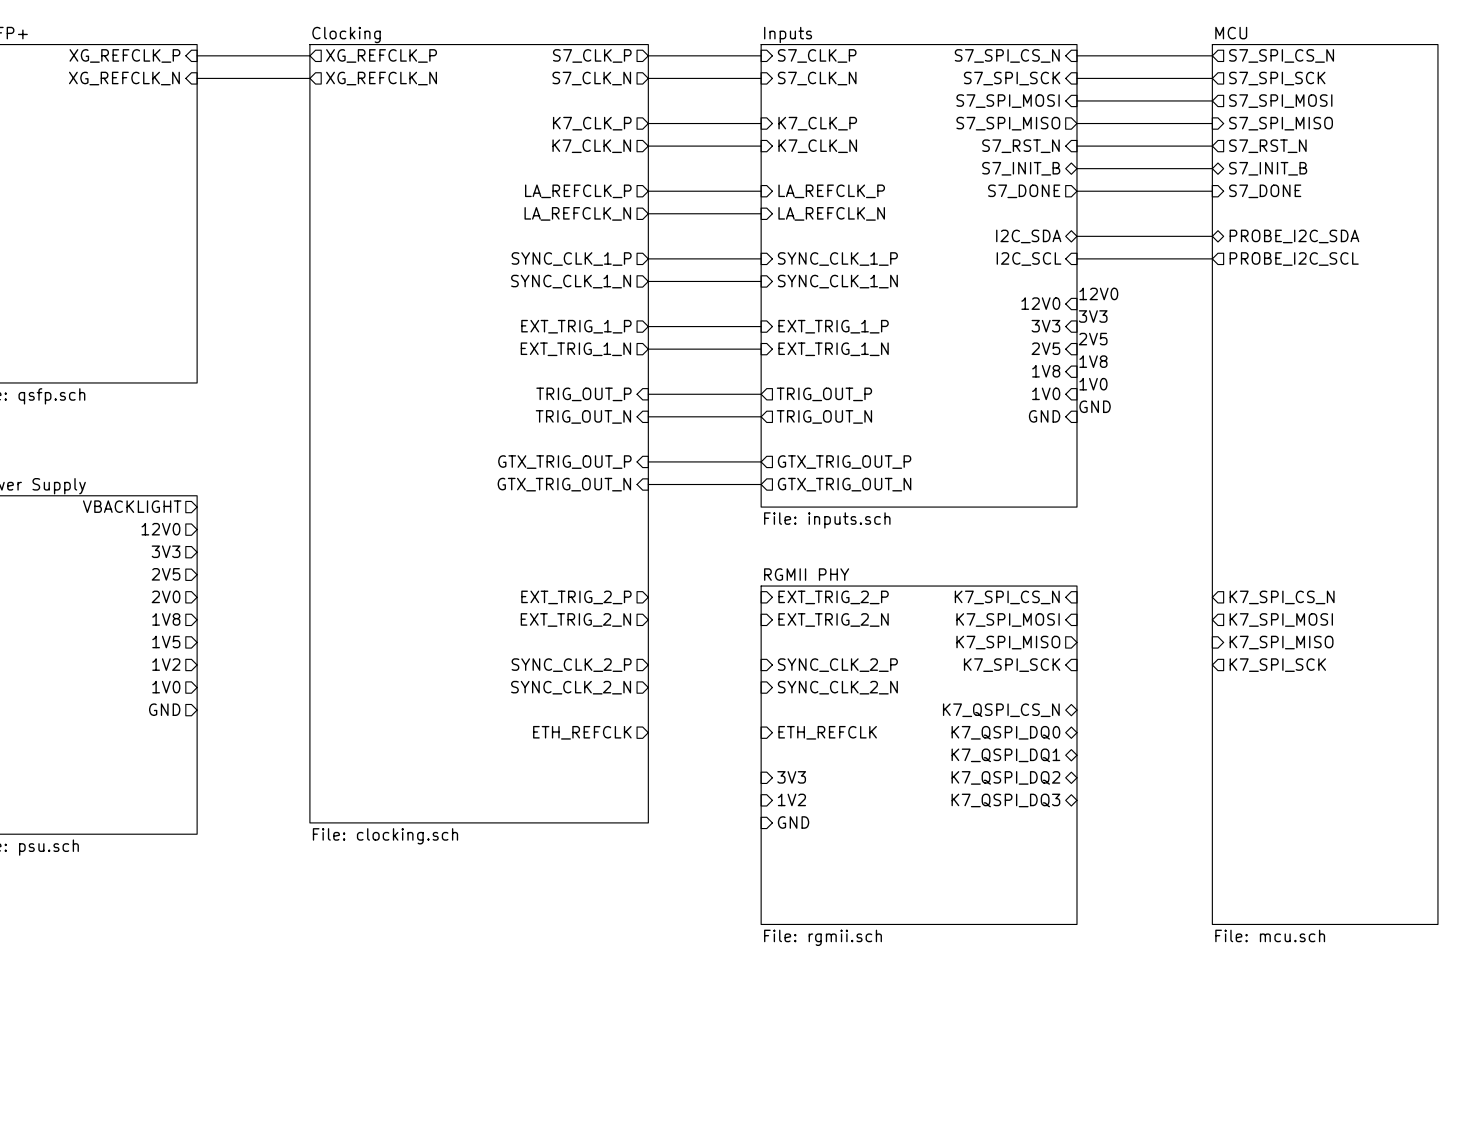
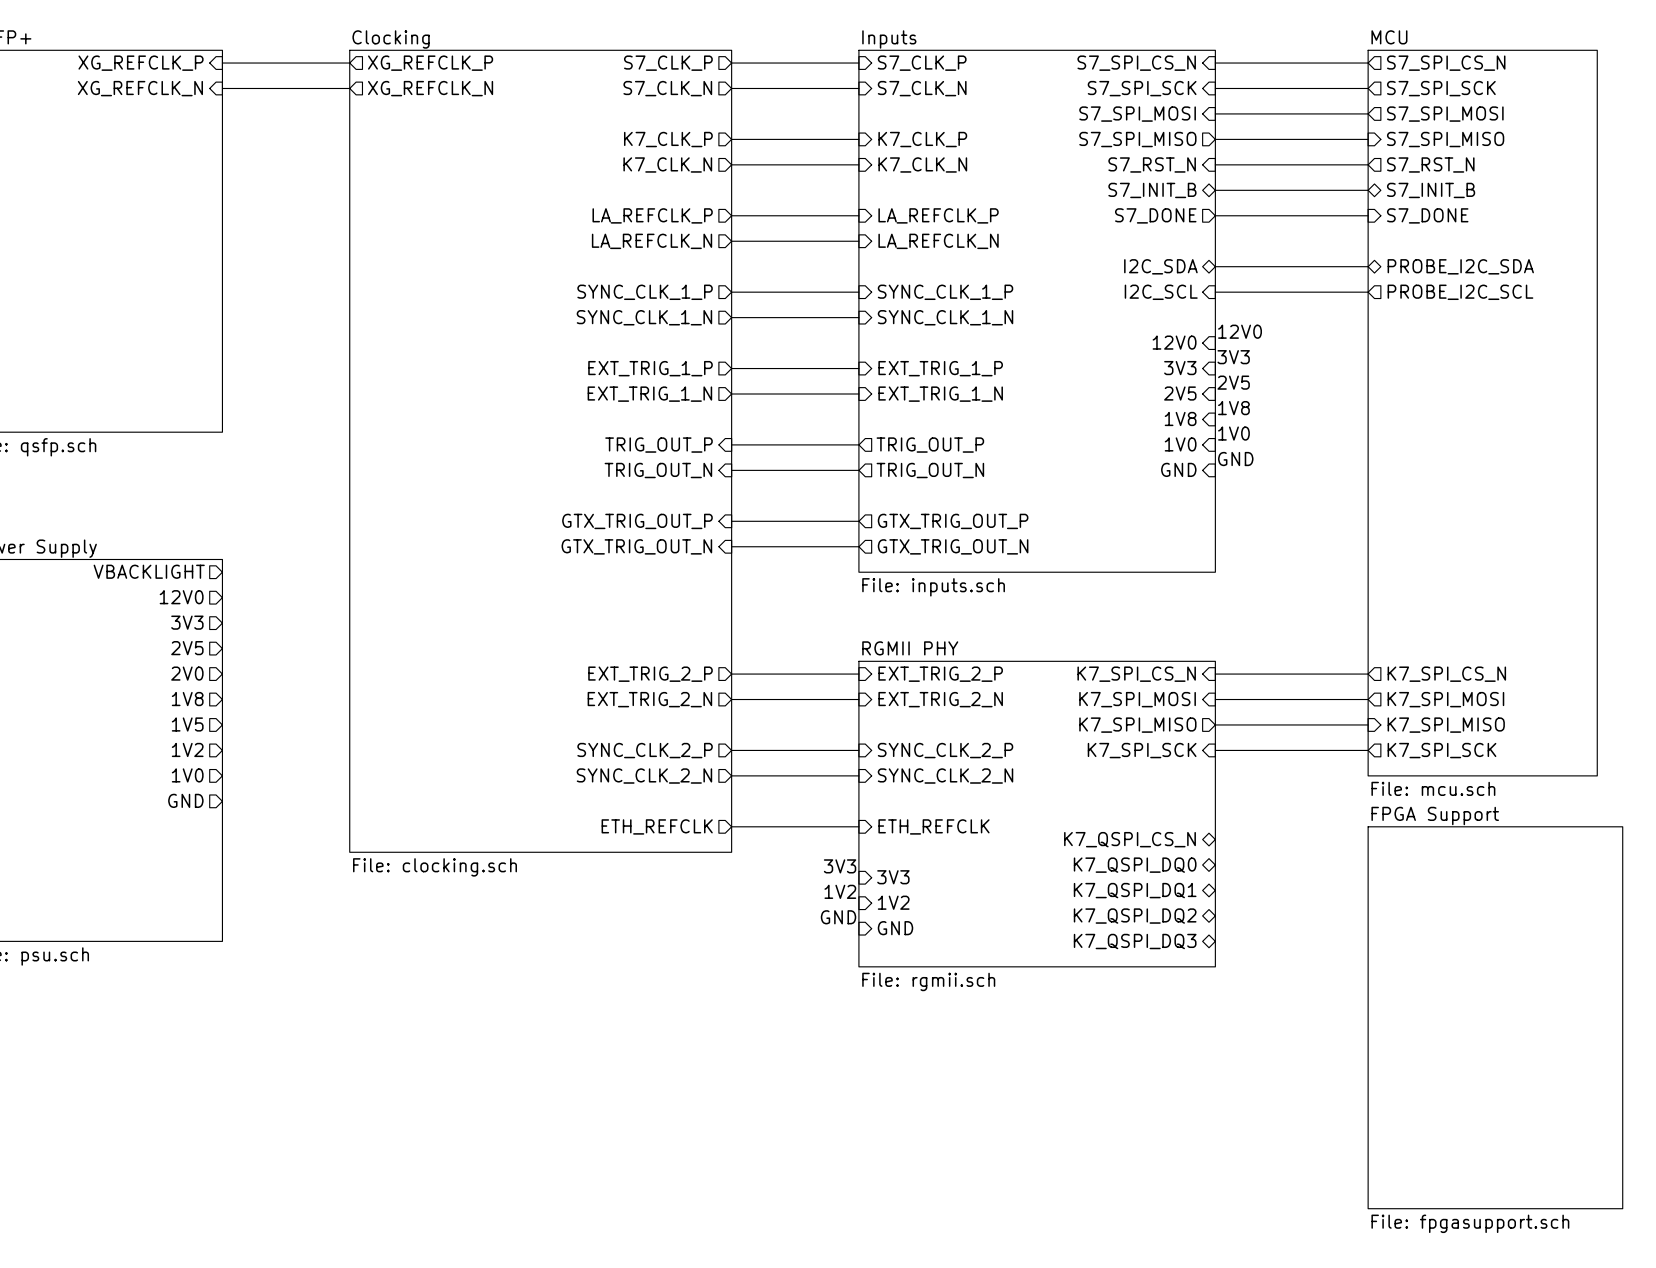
sheet MCU: none -> File: mcu.sch (1482, 413)
sheet Clocking: none -> File: clocking.sch (540, 451)
sheet Clocking: File: clocking.sch (479, 433) -> none
sheet MCU: File: mcu.sch (1325, 484) -> none
wire: none -> (731, 674) (858, 674)
wire: none -> (1215, 674) (1368, 674)
wire: none -> (731, 699) (858, 699)
wire: none -> (1215, 699) (1368, 699)
wire: none -> (1215, 724) (1368, 724)
wire: none -> (731, 750) (858, 750)
wire: none -> (1215, 750) (1368, 750)
wire: none -> (731, 775) (858, 775)
sheet pin position: K7_QSPI_CS_N (1001, 710) -> K7_QSPI_CS_N (1130, 839)
sheet RGMII PHY: none -> File: rgmii.sch (1037, 814)
wire: none -> (731, 826) (858, 826)
sheet pin position: K7_QSPI_DQ0 (1005, 732) -> K7_QSPI_DQ0 (1135, 865)
sheet RGMII PHY: File: rgmii.sch (919, 755) -> none
sheet pin position: K7_QSPI_DQ1 (1005, 755) -> K7_QSPI_DQ1 (1135, 890)
label: none -> 3V3 (840, 866)
sheet pin position: K7_QSPI_DQ2 (1005, 777) -> K7_QSPI_DQ2 (1135, 916)
label: none -> 1V2 (840, 891)
sheet pin position: K7_QSPI_DQ3 (1005, 800) -> K7_QSPI_DQ3 (1135, 941)
label: none -> GND (838, 917)
sheet FPGA Support: none -> File: fpgasupport.sch (1495, 1017)

